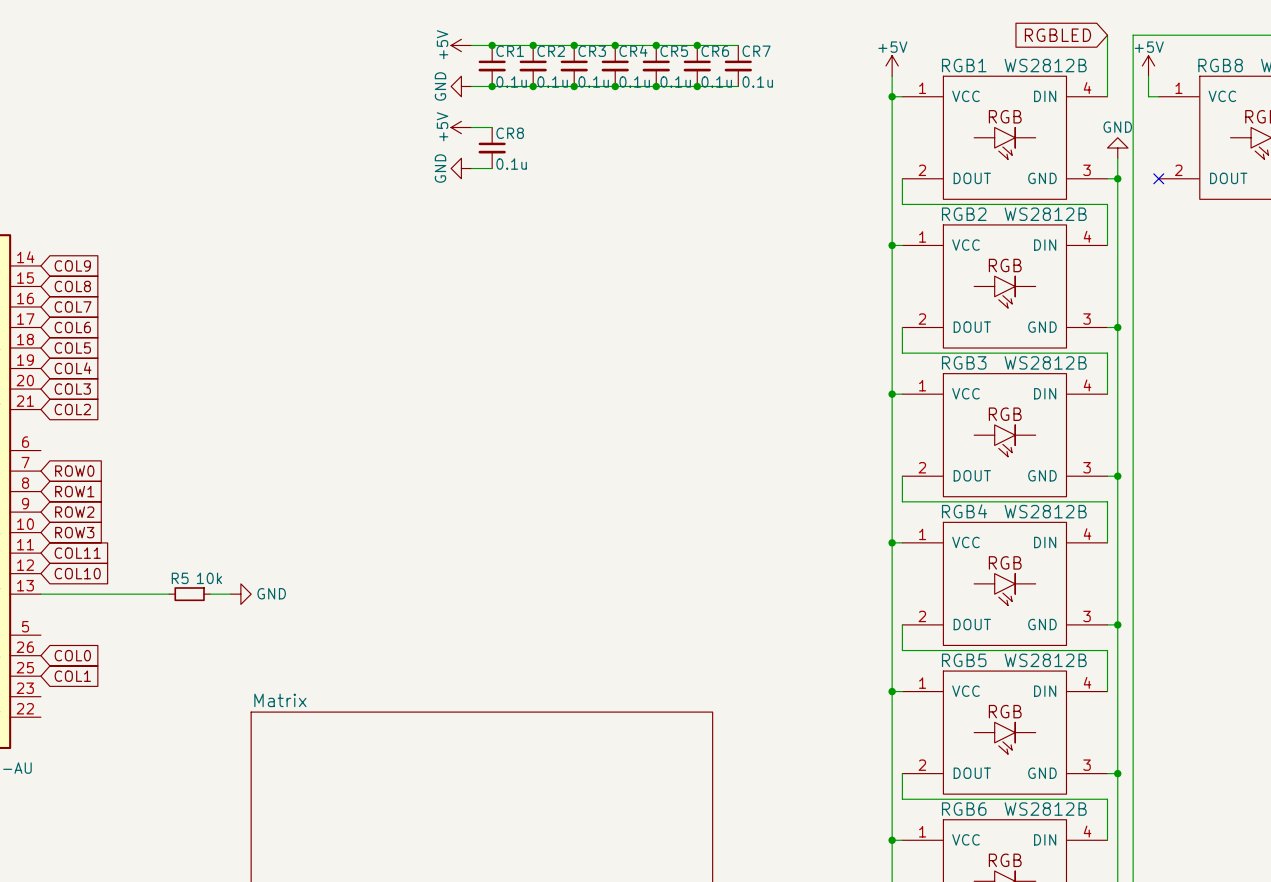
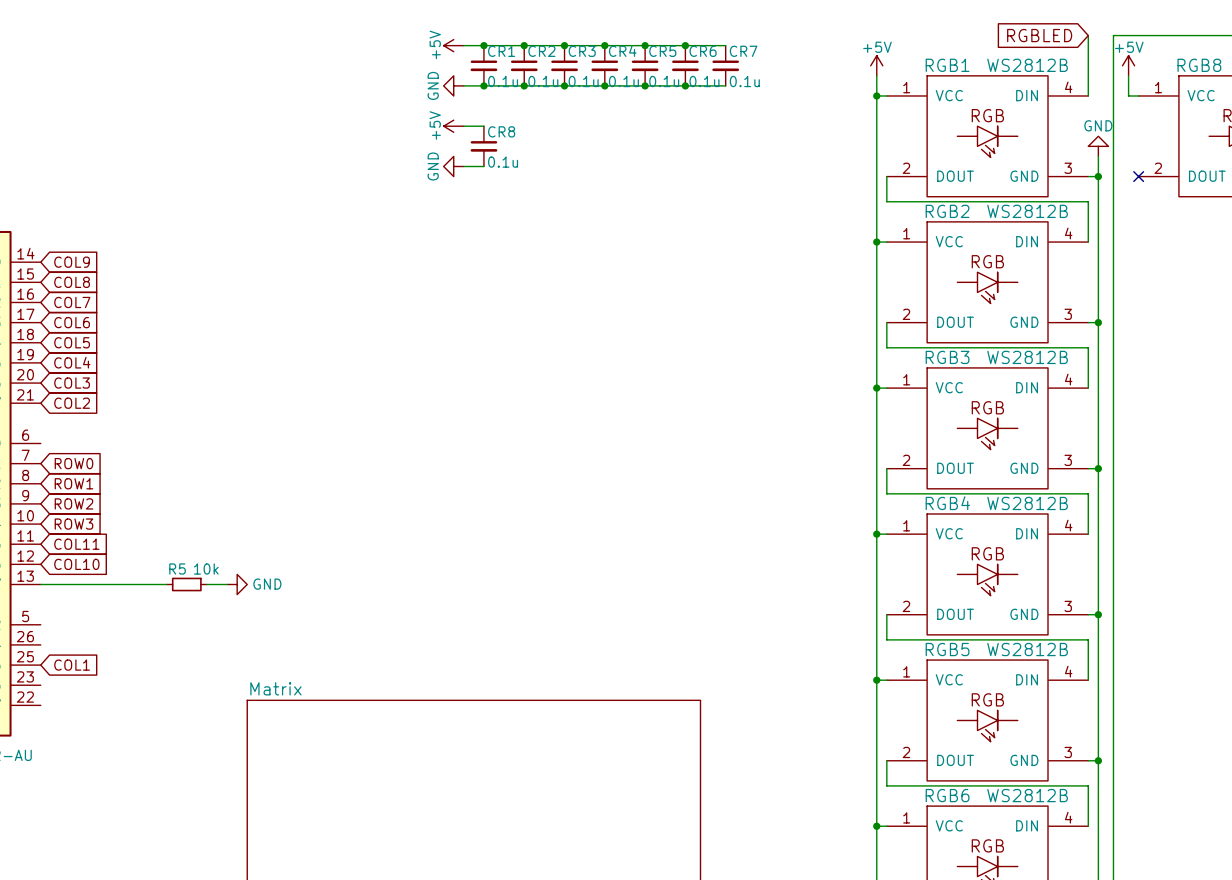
global label: COL0 (72, 655) -> none

